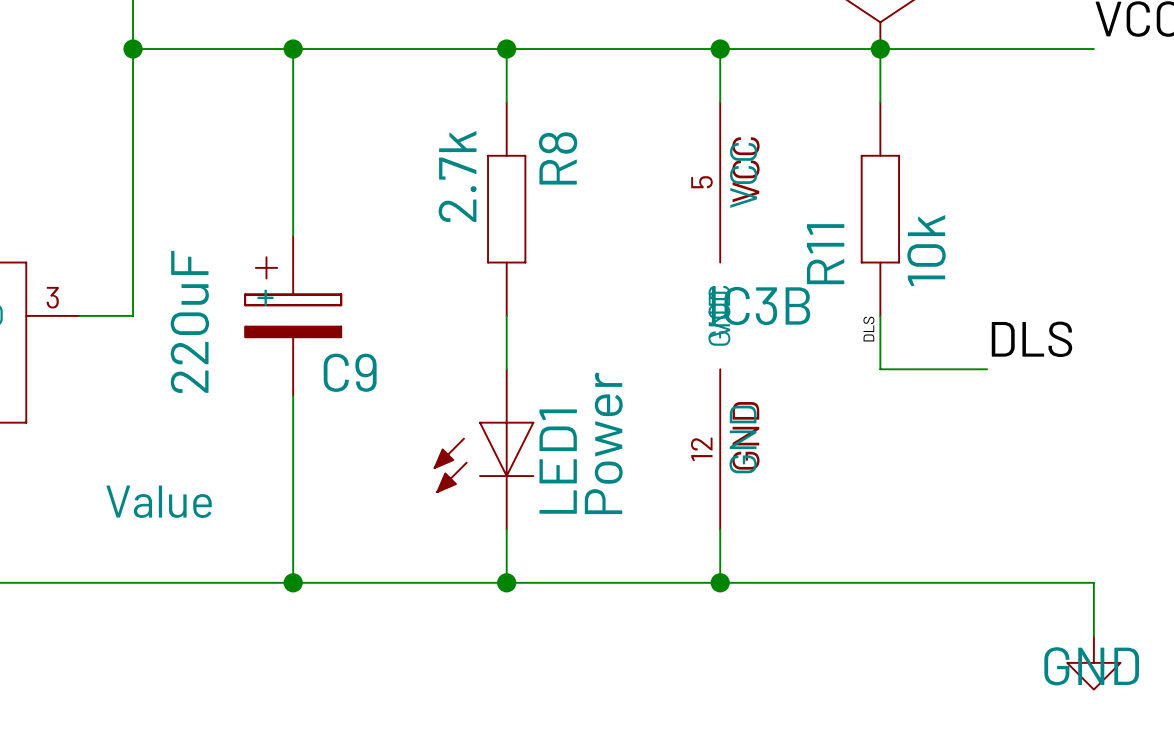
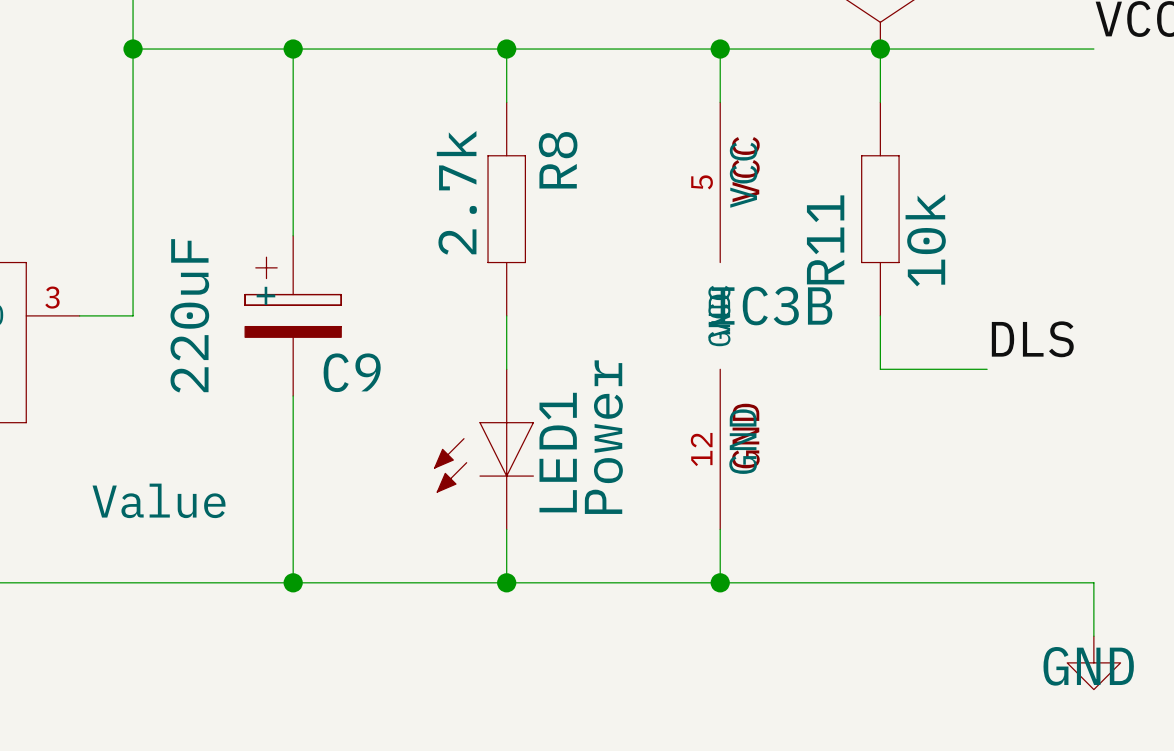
label: DLS (868, 329) -> none

